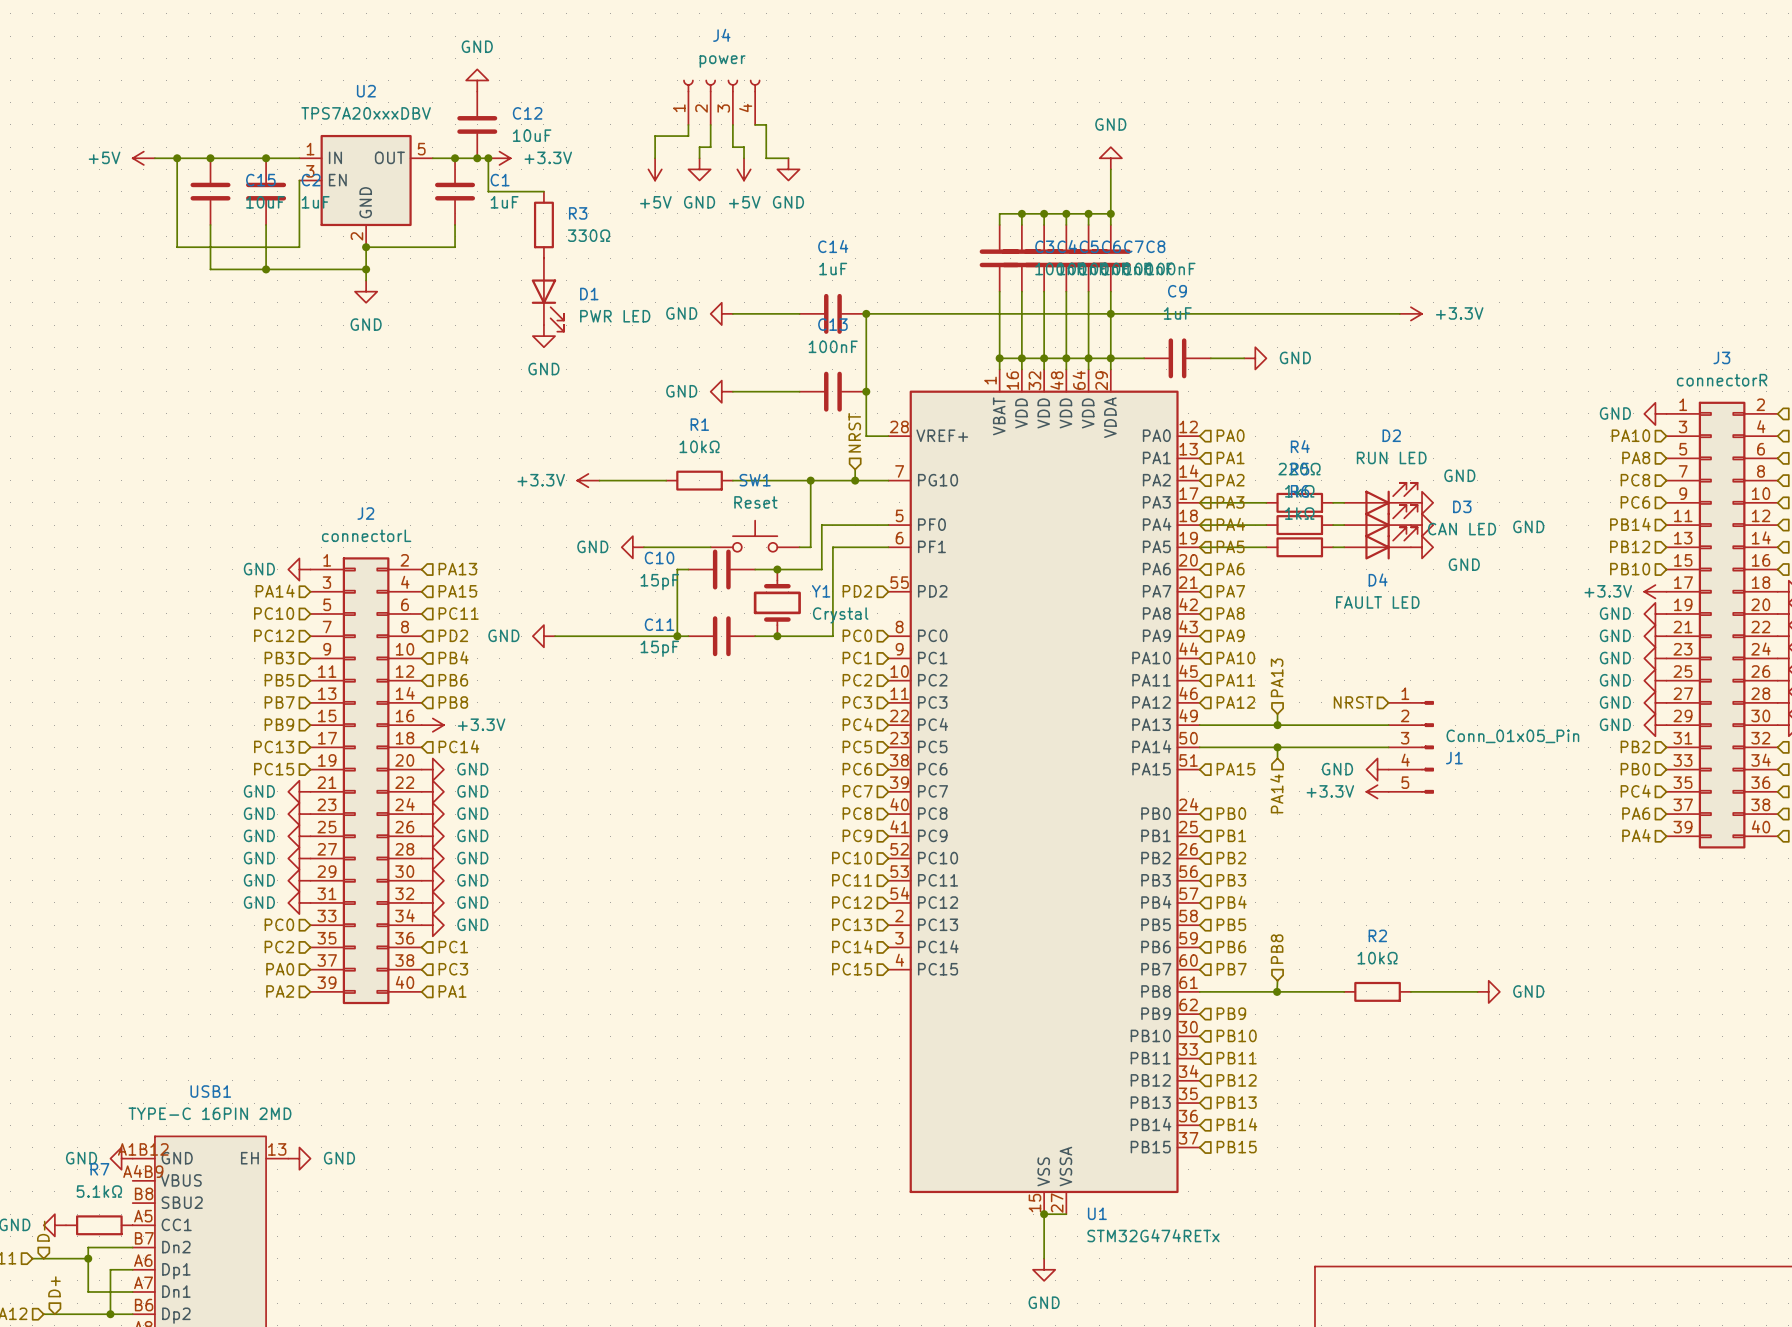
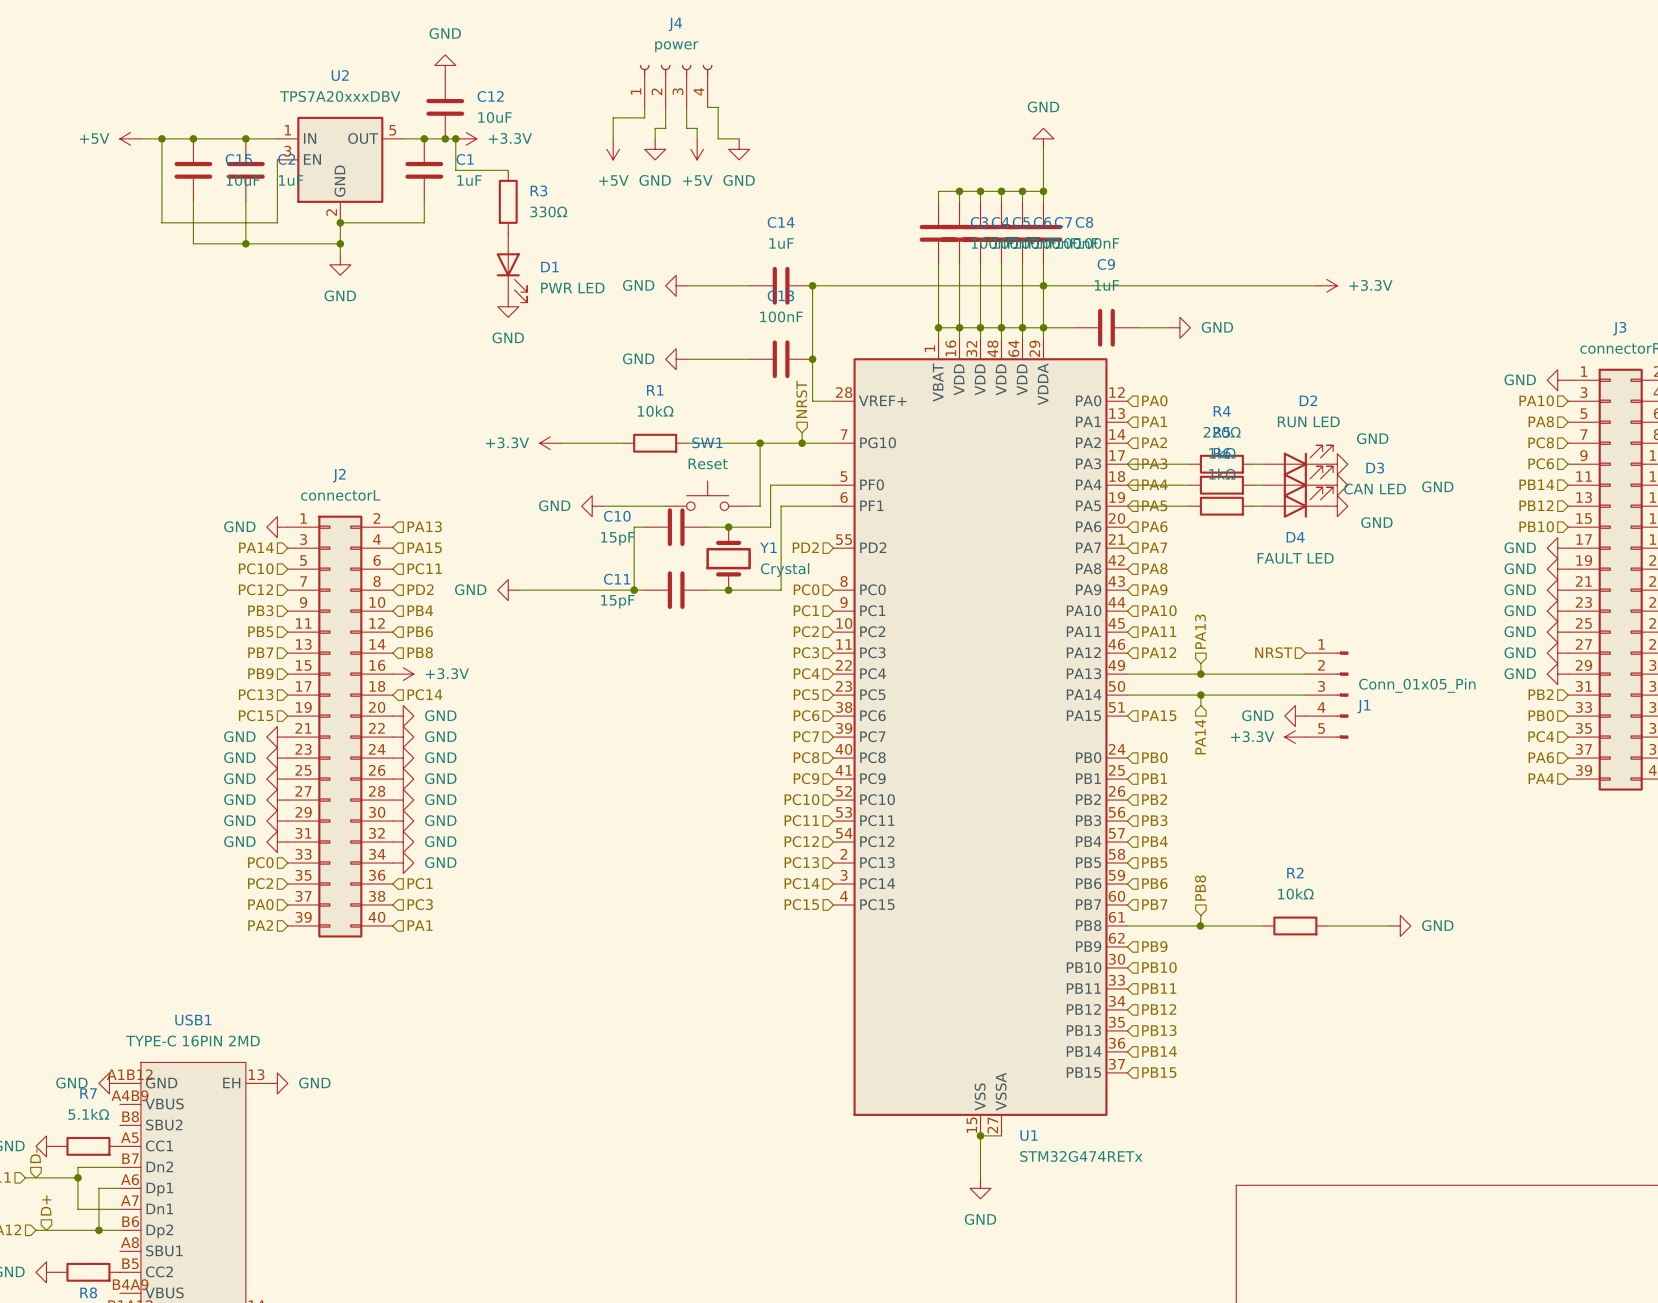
power symbol: +3.3V (1655, 591) -> GND (1557, 548)

